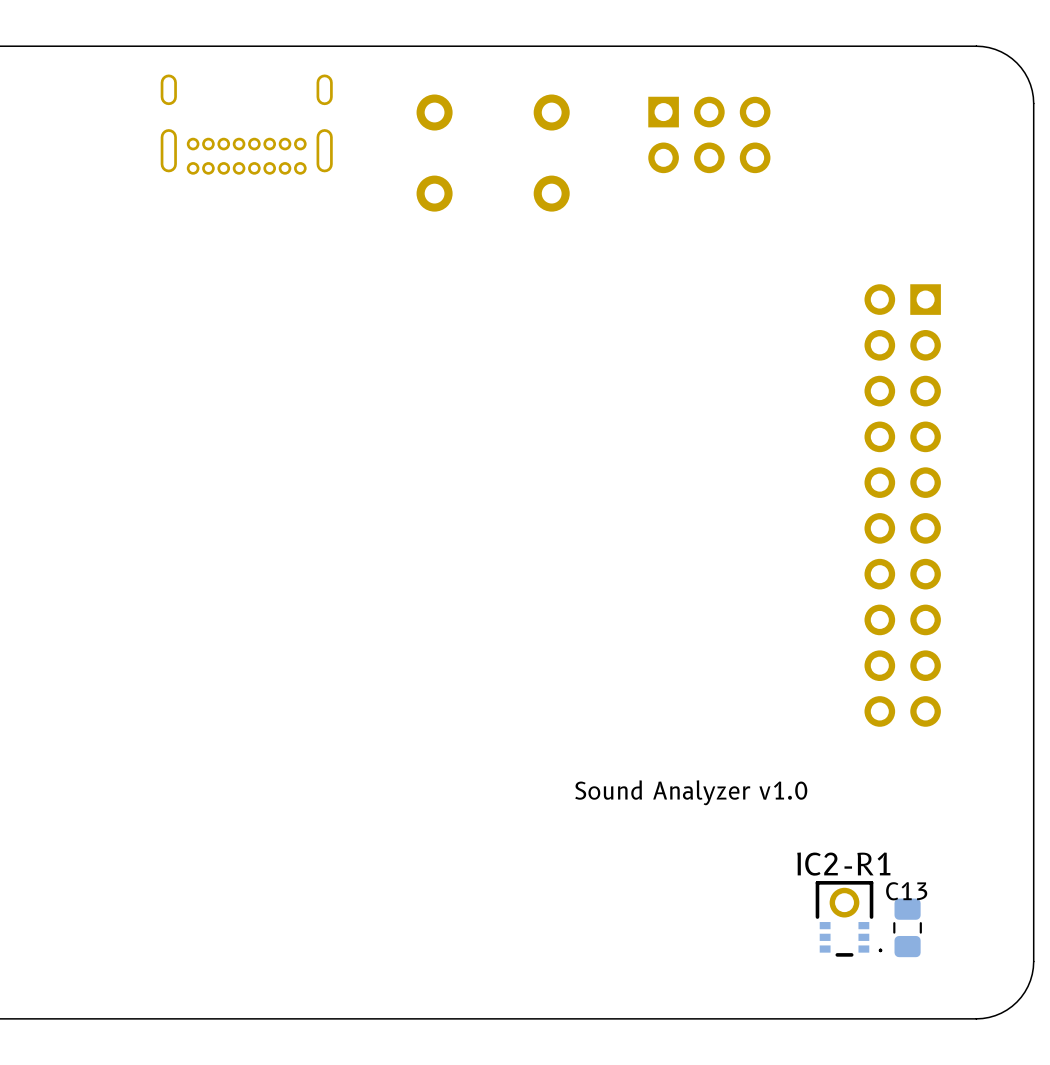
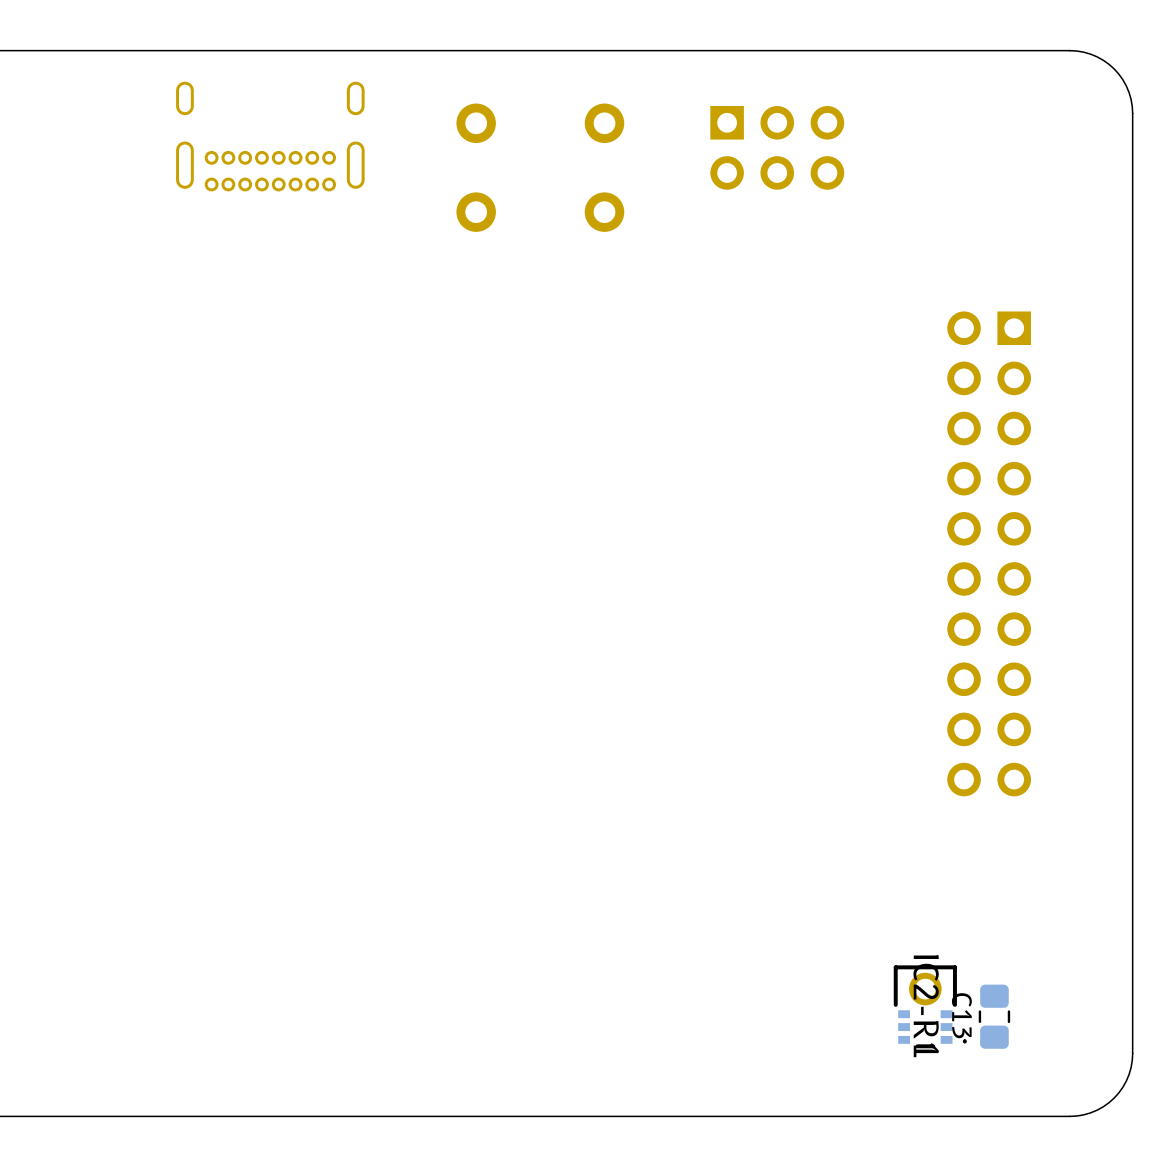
text: Sound Analyzer v1.0 (691, 792) -> none
IC2-R1 name rotation: 0° (843, 864) -> 90° clockwise (926, 1006)
C13 name rotation: 0° (906, 891) -> 90° clockwise (961, 1015)

